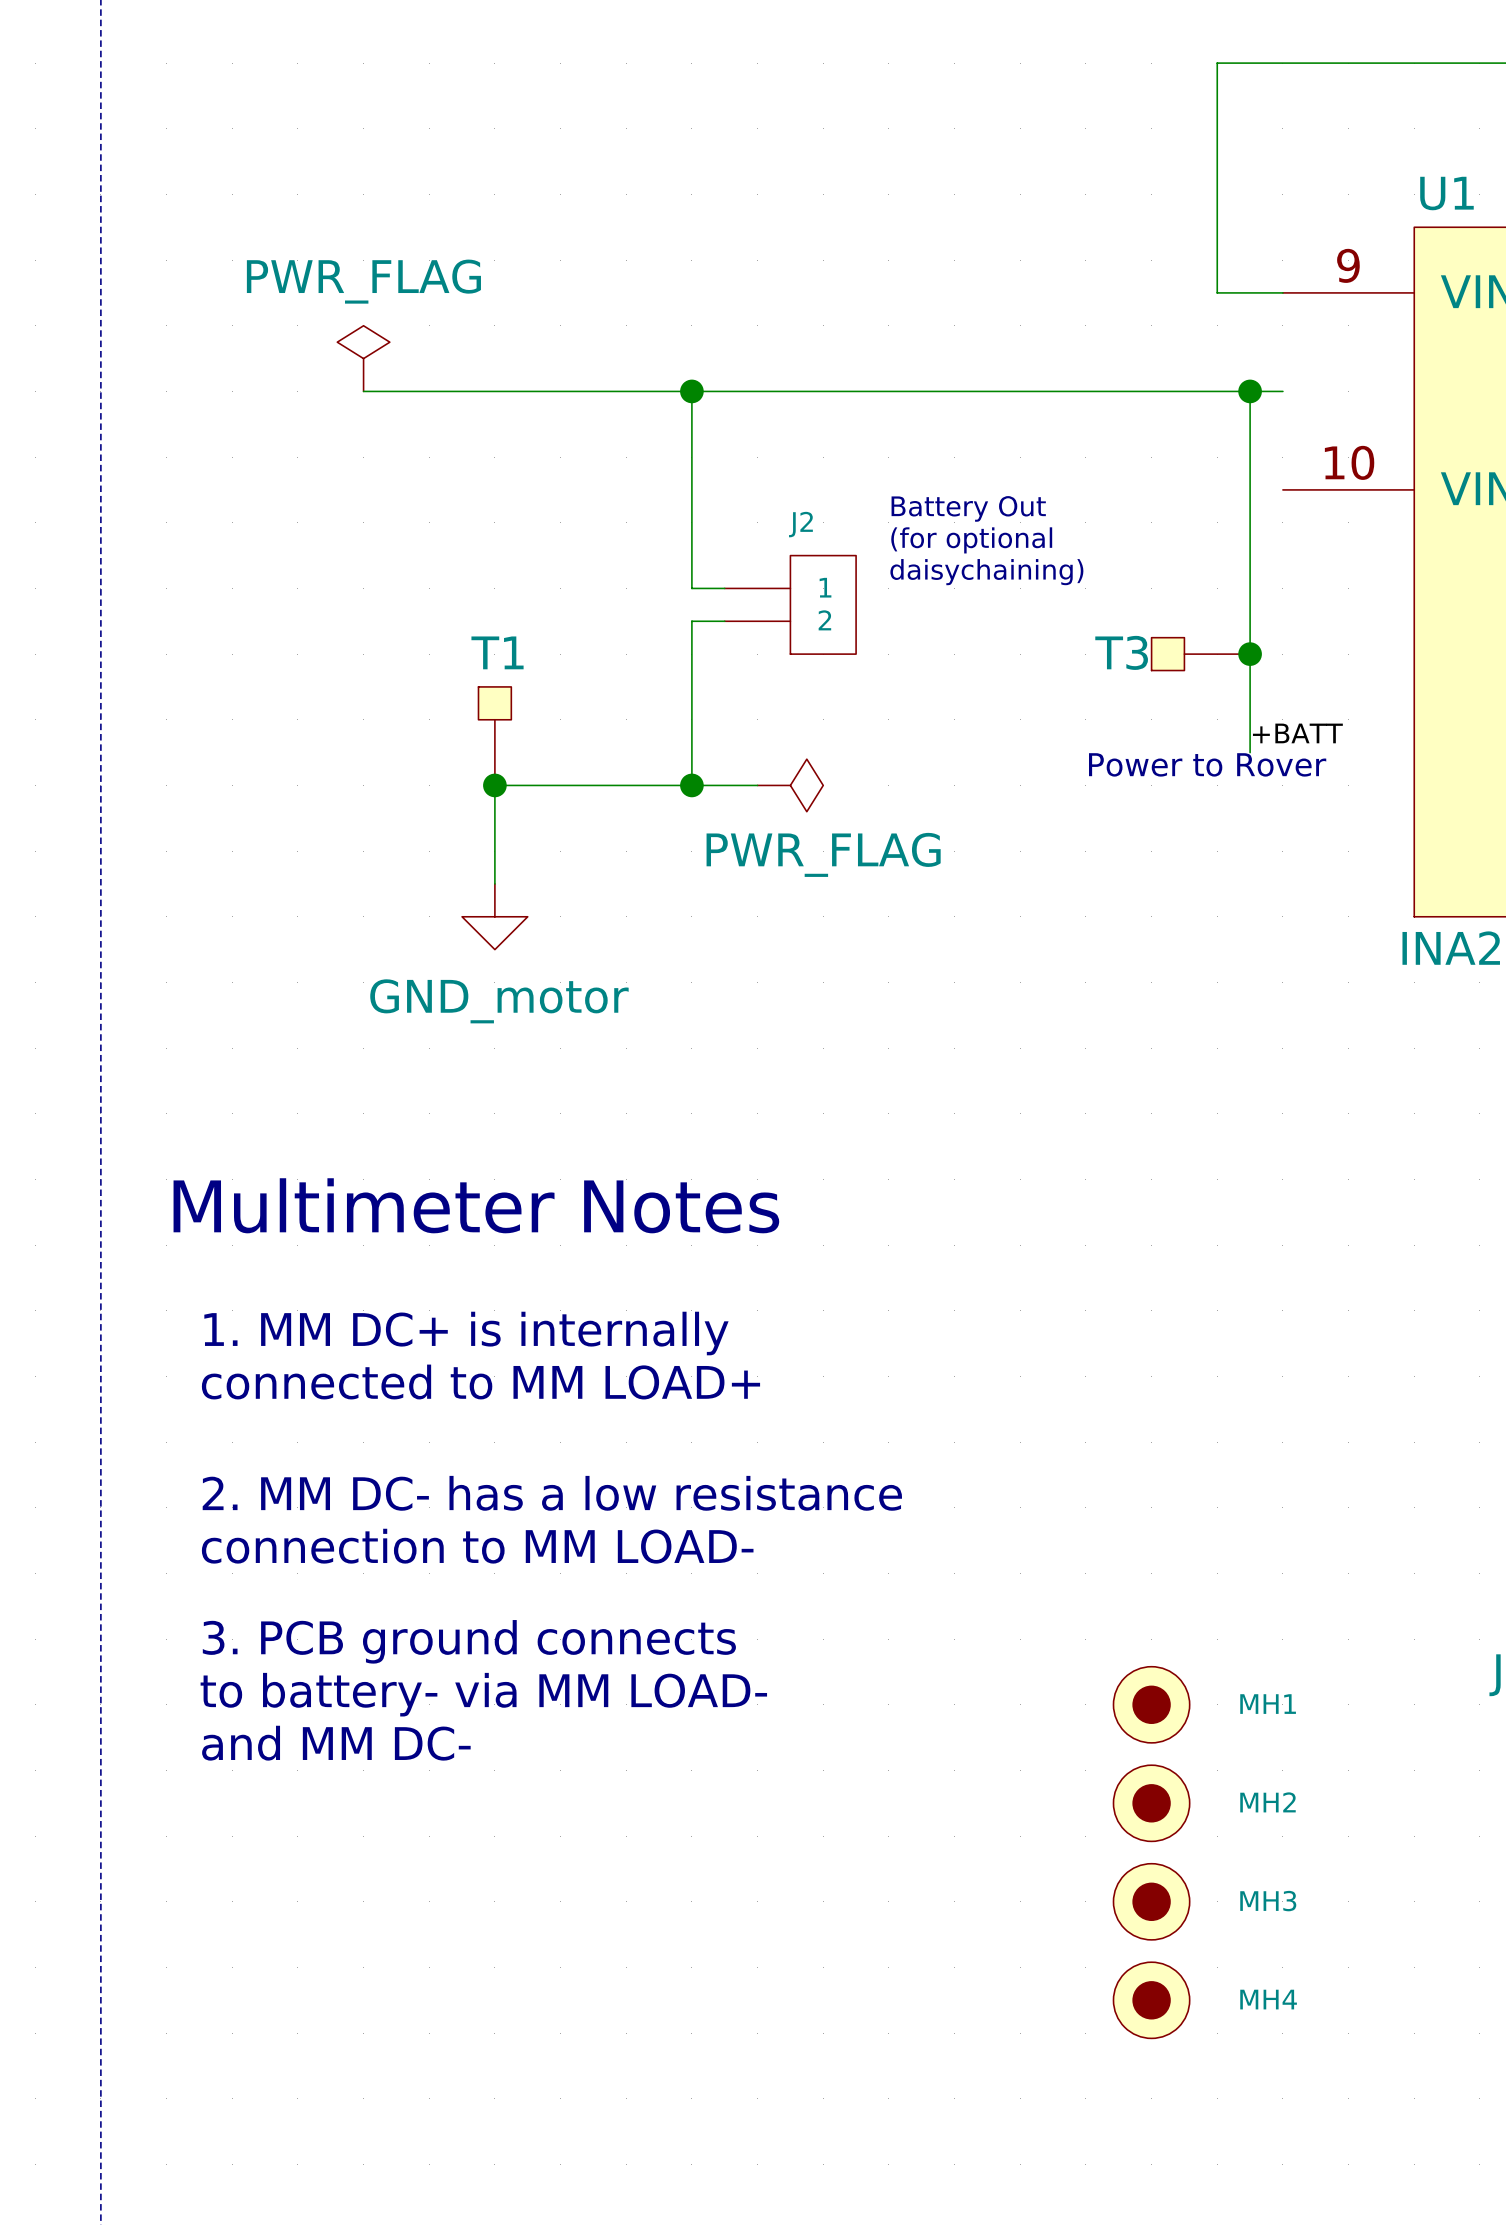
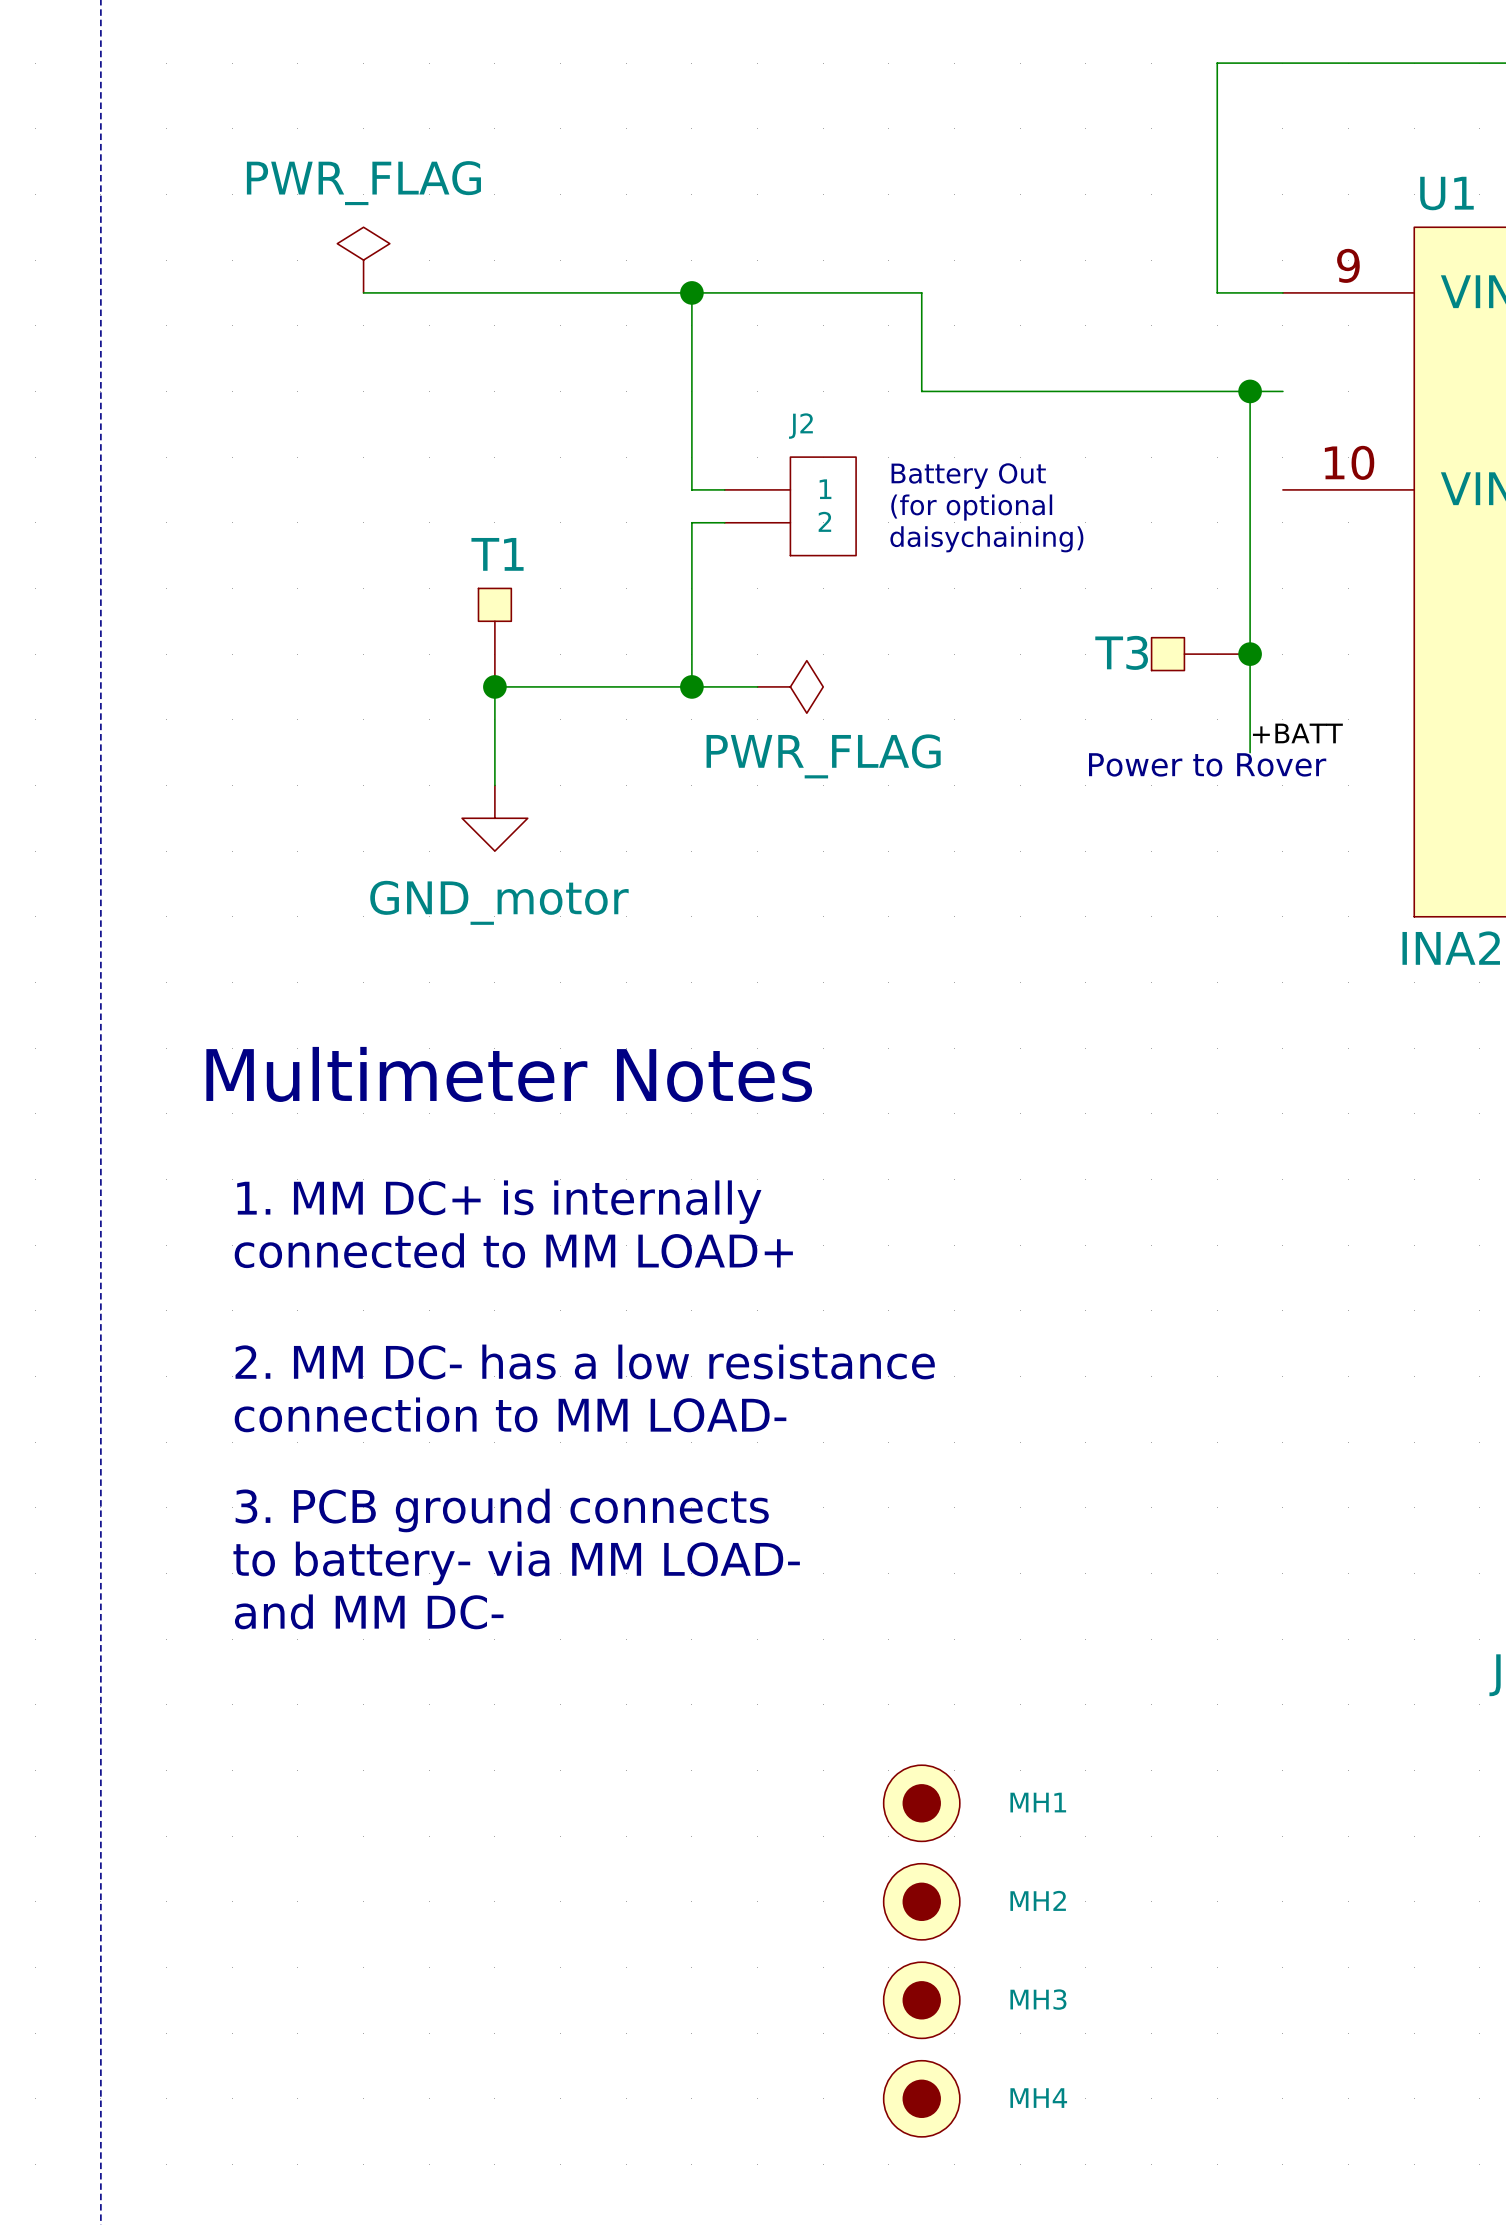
power symbol position: PWR_FLAG (363, 358) -> PWR_FLAG (363, 260)
wire: (363, 391) (921, 391) -> (363, 292) (921, 292) (921, 391)
junction position: (691, 391) -> (691, 292)
text: none -> Battery Out (968, 476)
wire: (691, 489) (691, 522) -> (691, 489) (724, 489)
text: Battery Out (968, 508) -> (for optional (971, 507)
text: (for optional (971, 540) -> daisychaining) (986, 539)
text: daisychaining) (986, 572) -> none
wire: (691, 588) (724, 588) -> (691, 588) (691, 621)
J2 position: (790, 604) -> (790, 506)
wire: (691, 621) (724, 621) -> (691, 522) (724, 522)
wire: (691, 686) (691, 785) -> (691, 292) (691, 391)
T1 position: (494, 736) -> (494, 637)
junction position: (494, 785) -> (494, 686)
junction position: (691, 785) -> (691, 686)
wire: (757, 785) (494, 785) (494, 883) -> (757, 686) (494, 686) (494, 785)
power symbol position: PWR_FLAG (790, 785) -> PWR_FLAG (790, 686)
power symbol position: GND_motor (494, 916) -> GND_motor (494, 818)
text position: Multimeter Notes (476, 1205) -> Multimeter Notes (509, 1074)
text position: 1. MM DC+ is internally (466, 1333) -> 1. MM DC+ is internally (499, 1202)
text position: connected to MM LOAD+ (480, 1382) -> connected to MM LOAD+ (513, 1250)
text position: 2. MM DC- has a low resistance (552, 1493) -> 2. MM DC- has a low resistance (585, 1361)
text position: connection to MM LOAD- (477, 1546) -> connection to MM LOAD- (510, 1414)
text position: 3. PCB ground connects (469, 1641) -> 3. PCB ground connects (502, 1510)
text position: to battery- via MM LOAD- (483, 1694) -> to battery- via MM LOAD- (516, 1563)
MH1 position: (1151, 1704) -> (921, 1803)
text position: and MM DC- (336, 1743) -> and MM DC- (369, 1611)
MH2 position: (1151, 1803) -> (921, 1901)
MH3 position: (1151, 1901) -> (921, 2000)
MH4 position: (1151, 2000) -> (921, 2098)

